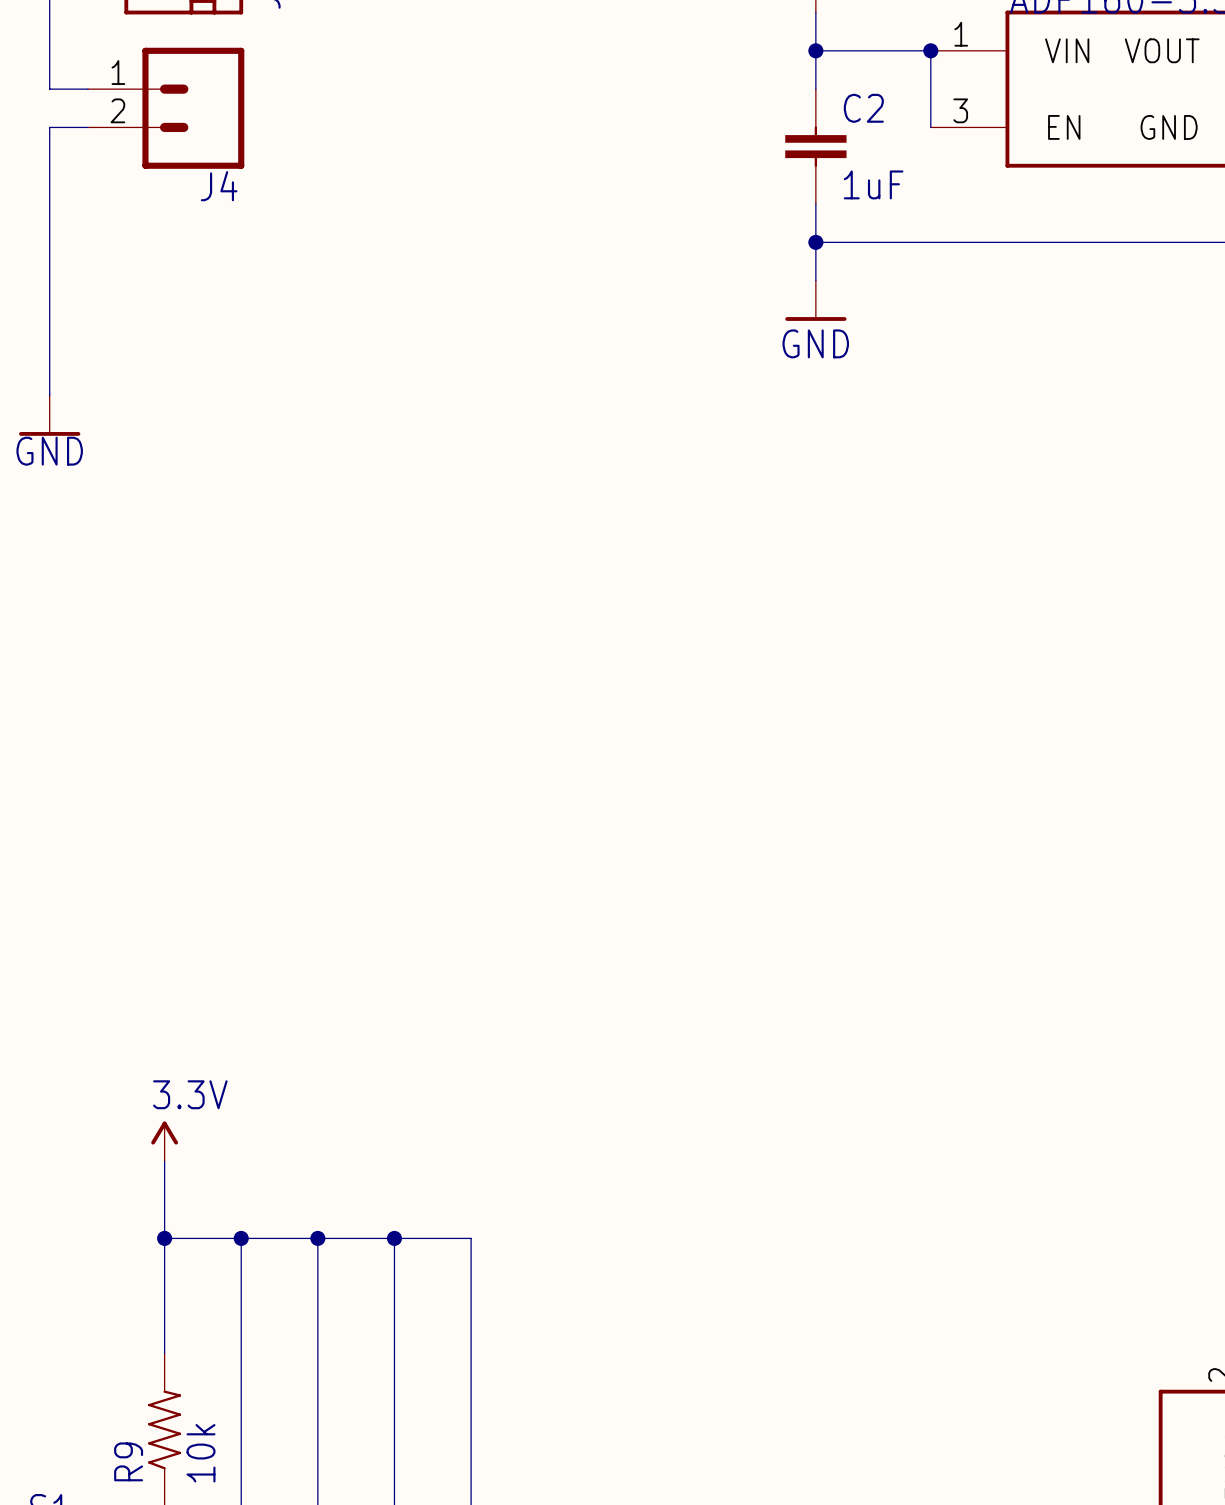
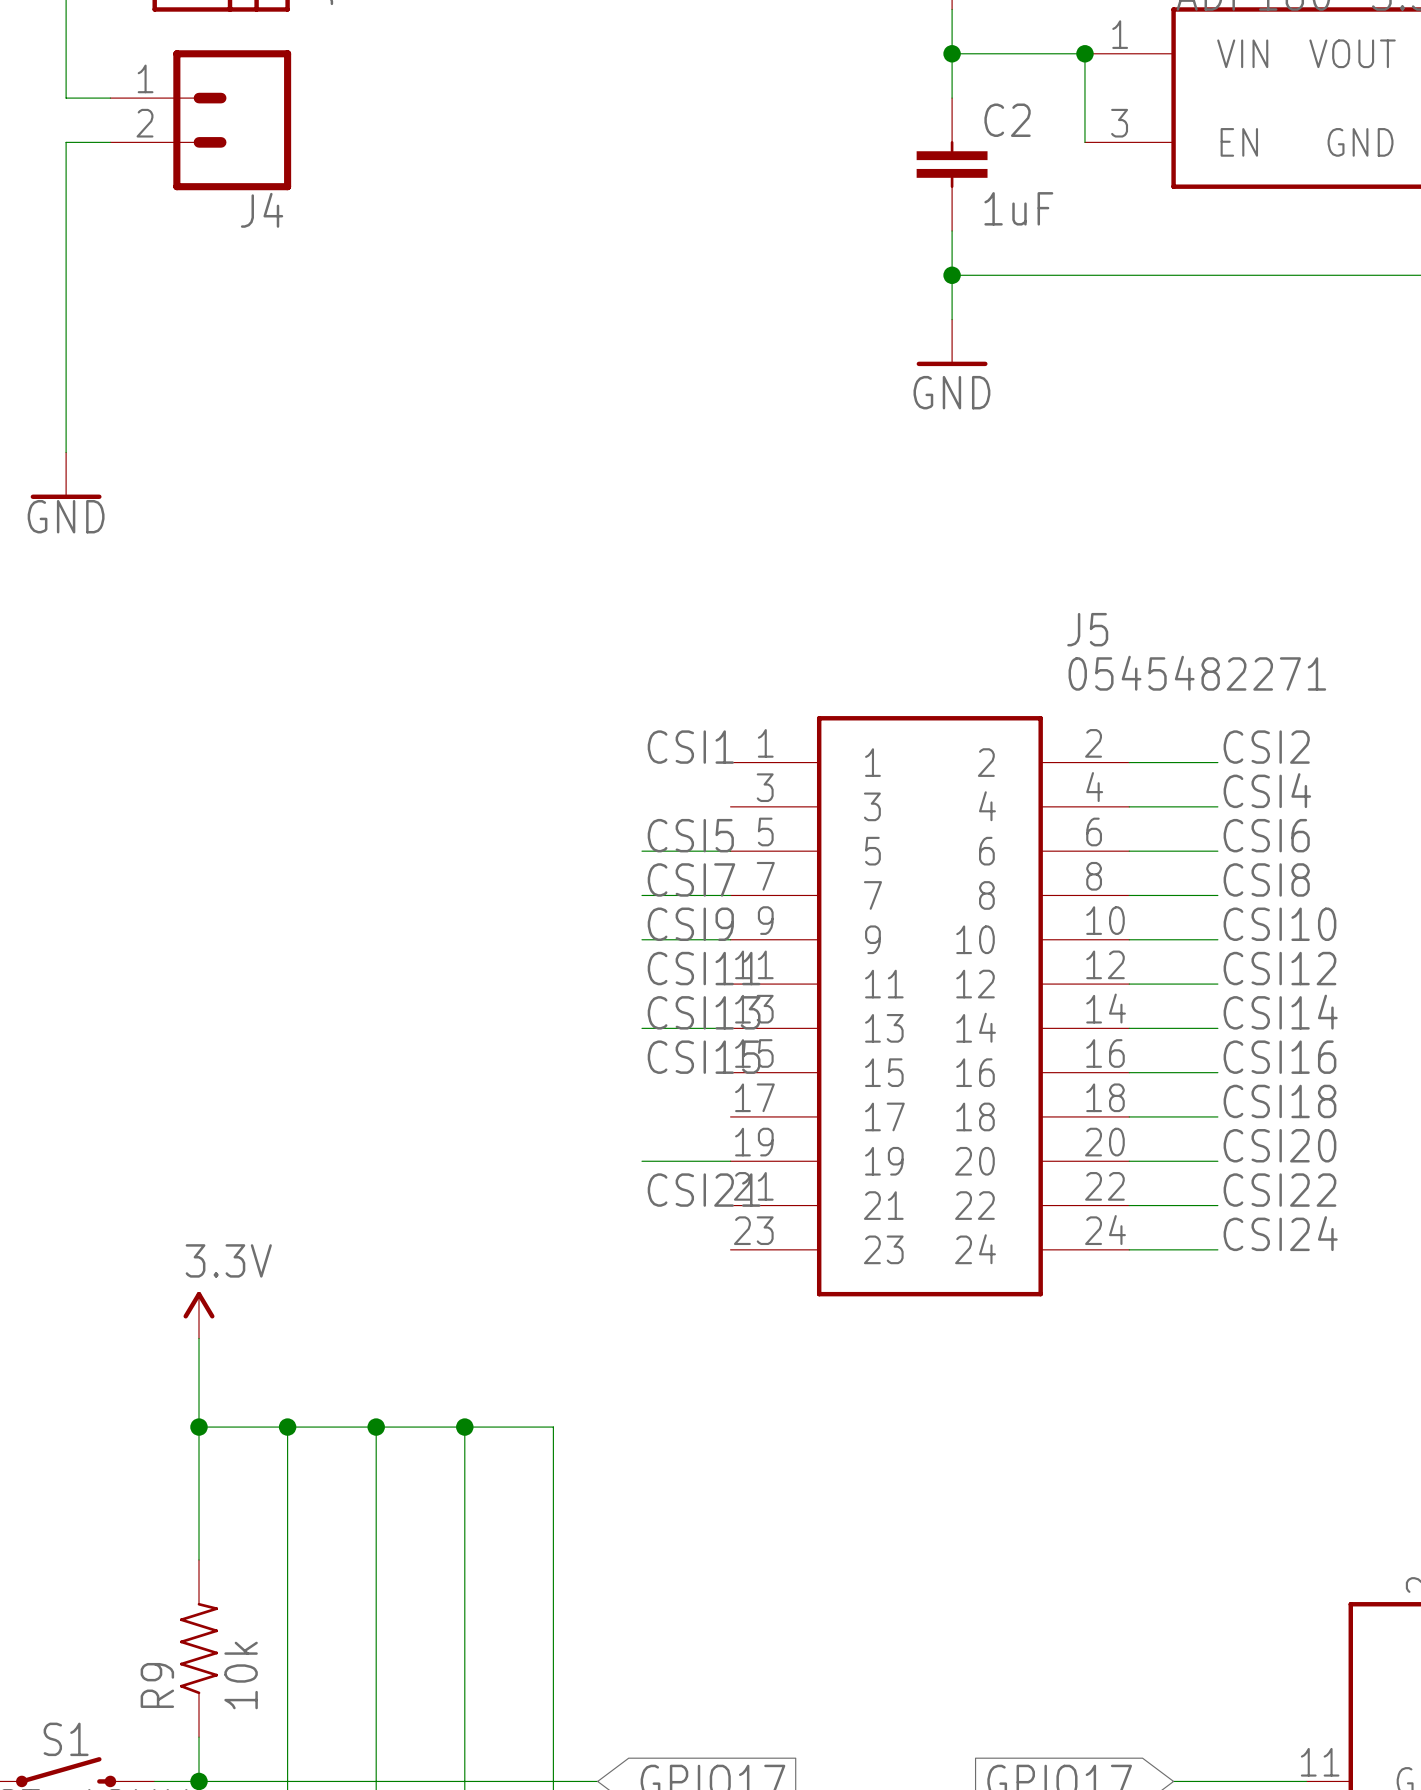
label: none -> CSI1 (690, 747)
label: none -> CSI2 (1266, 747)
wire: none -> (1129, 762) (1217, 762)
label: none -> CSI4 (1267, 790)
wire: none -> (1129, 806) (1217, 806)
label: none -> CSI5 (690, 835)
label: none -> CSI6 (1266, 835)
wire: none -> (641, 851) (730, 851)
wire: none -> (1129, 851) (1217, 851)
label: none -> CSI7 (691, 879)
label: none -> CSI8 (1266, 879)
wire: none -> (641, 895) (730, 895)
wire: none -> (1129, 895) (1217, 895)
label: none -> CSI9 (690, 924)
label: none -> CSI10 (1279, 924)
wire: none -> (641, 939) (730, 939)
wire: none -> (1129, 939) (1217, 939)
label: none -> CSI11 (704, 968)
label: none -> CSI12 (1279, 968)
wire: none -> (1129, 984) (1217, 984)
J5: none -> 0545482271 (929, 1006)
label: none -> CSI14 (1280, 1012)
label: none -> CSI13 (704, 1012)
wire: none -> (641, 1028) (730, 1028)
wire: none -> (1129, 1028) (1217, 1028)
label: none -> CSI15 (704, 1057)
label: none -> CSI16 (1279, 1057)
wire: none -> (1129, 1072) (1217, 1072)
label: none -> CSI18 (1279, 1101)
wire: none -> (1129, 1116) (1217, 1116)
label: none -> CSI20 (1279, 1145)
wire: none -> (641, 1161) (730, 1161)
wire: none -> (1129, 1161) (1217, 1161)
label: none -> CSI21 (704, 1190)
label: none -> CSI22 (1279, 1190)
wire: none -> (1129, 1205) (1217, 1205)
label: none -> CSI24 (1280, 1233)
wire: none -> (1129, 1249) (1217, 1249)

